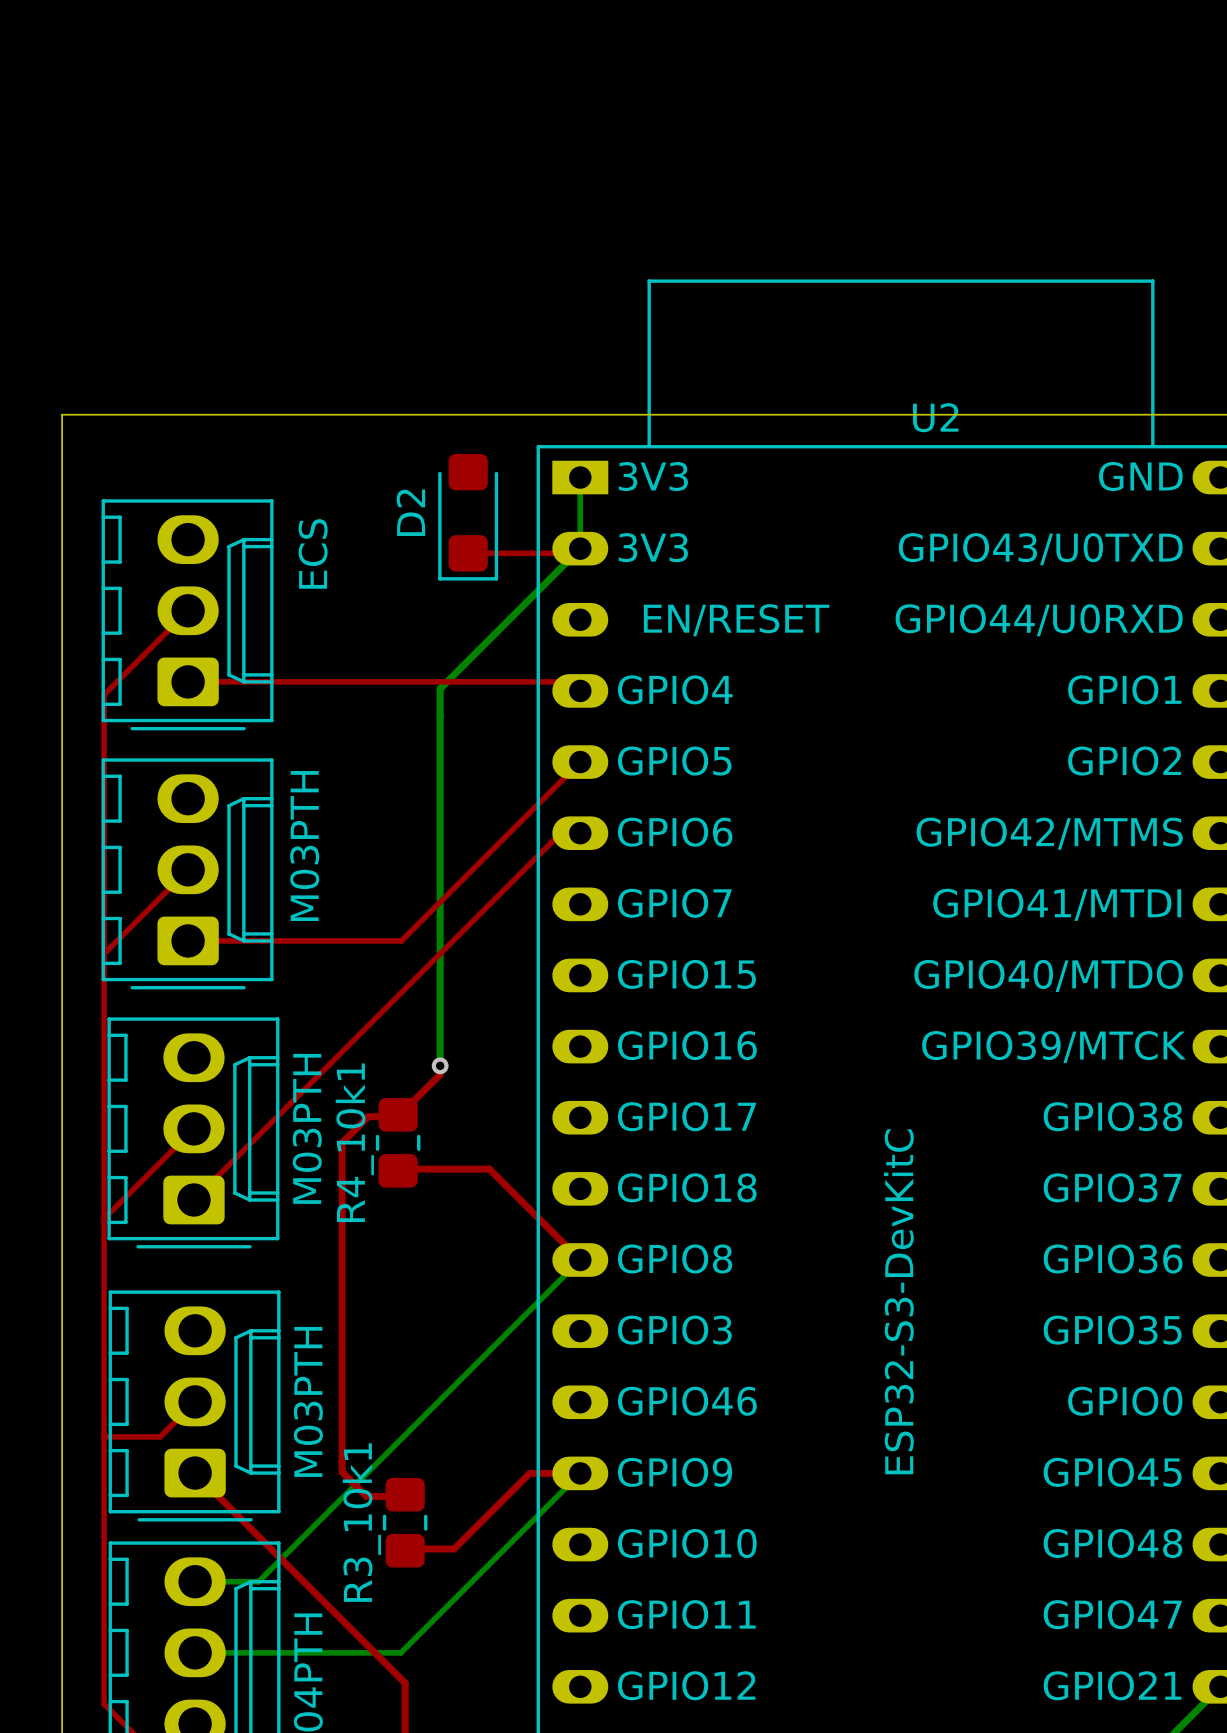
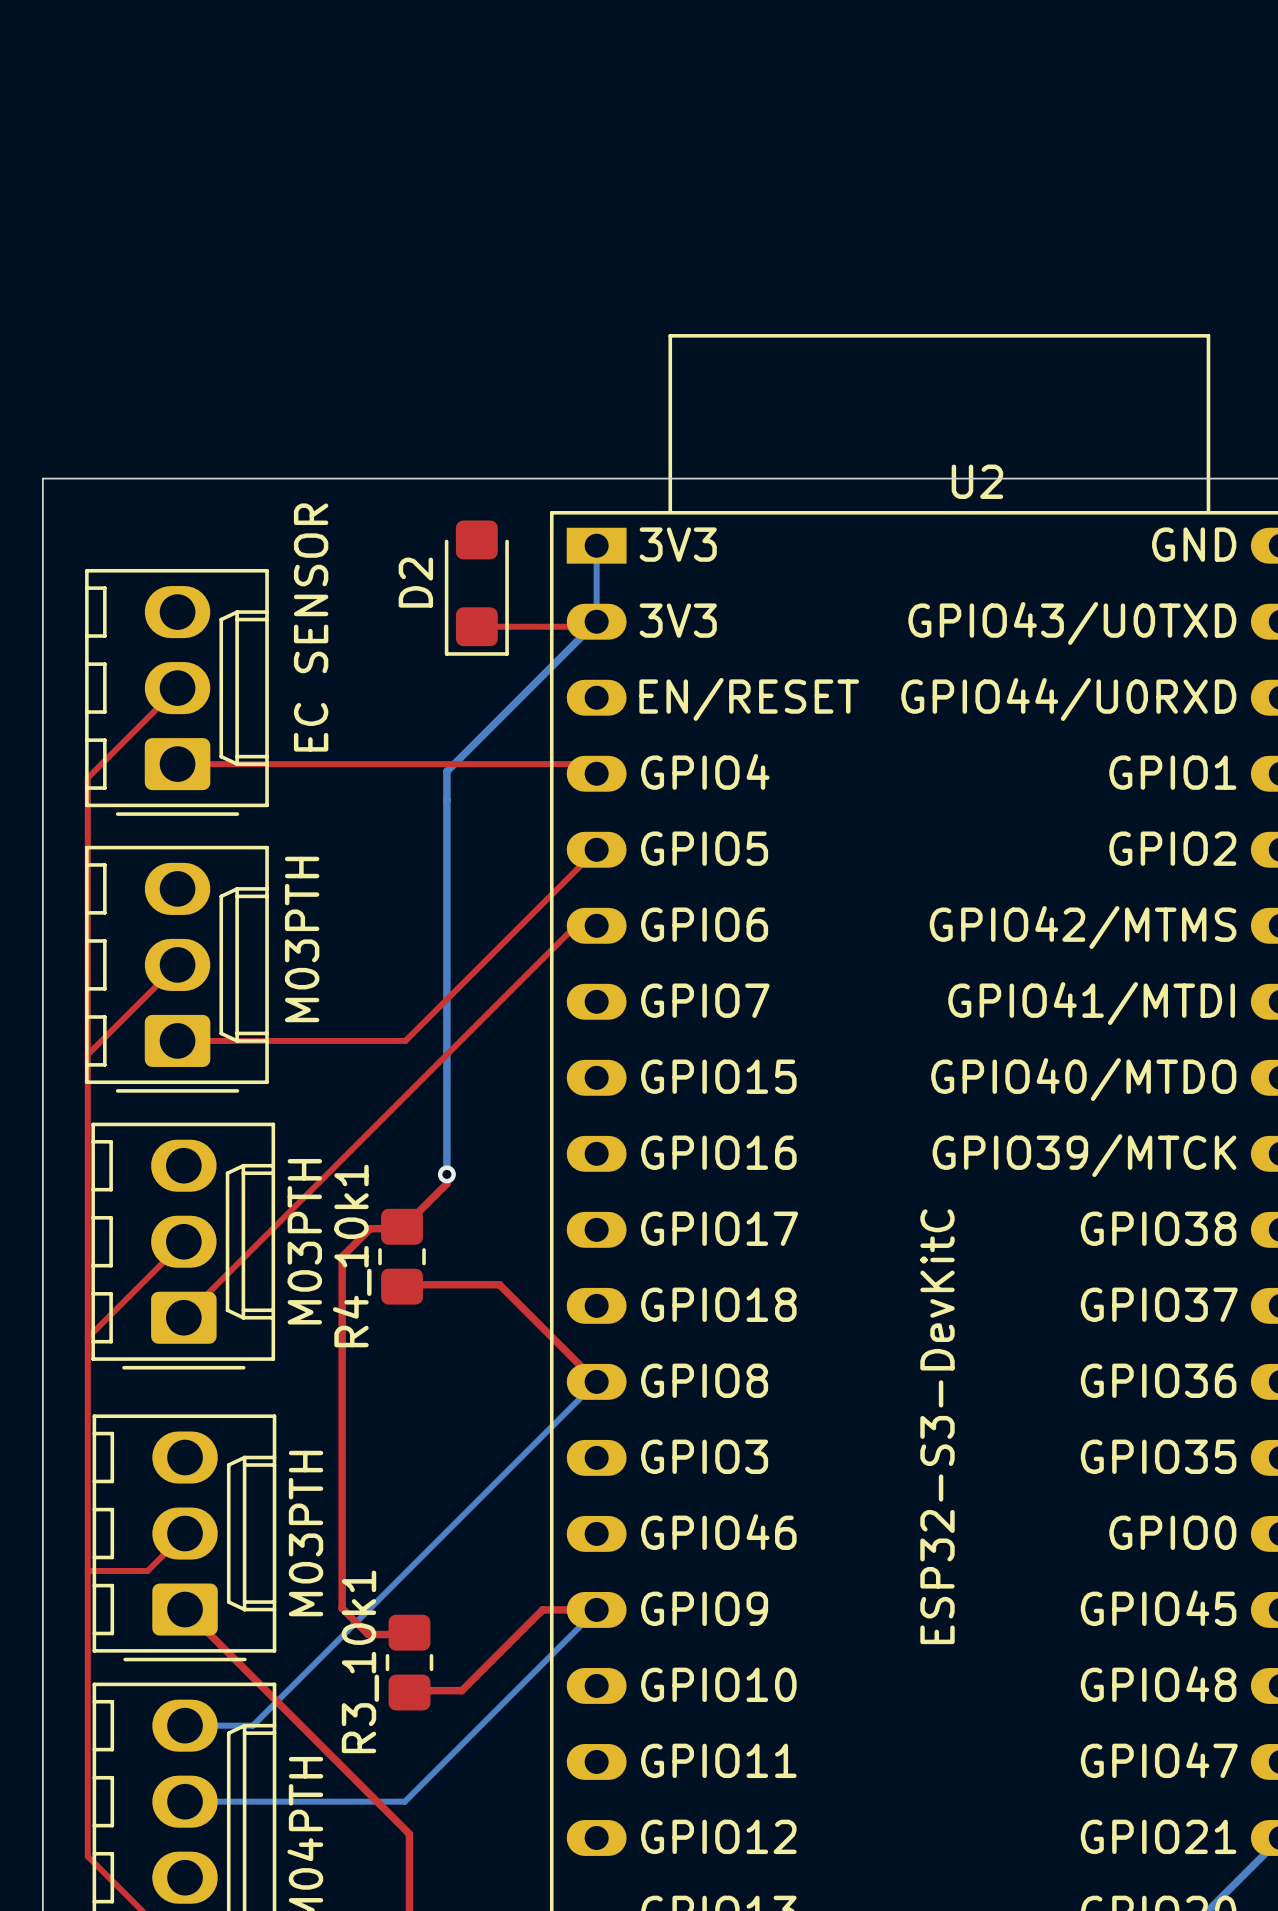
part value: ECS (313, 553) -> EC SENSOR (311, 627)

